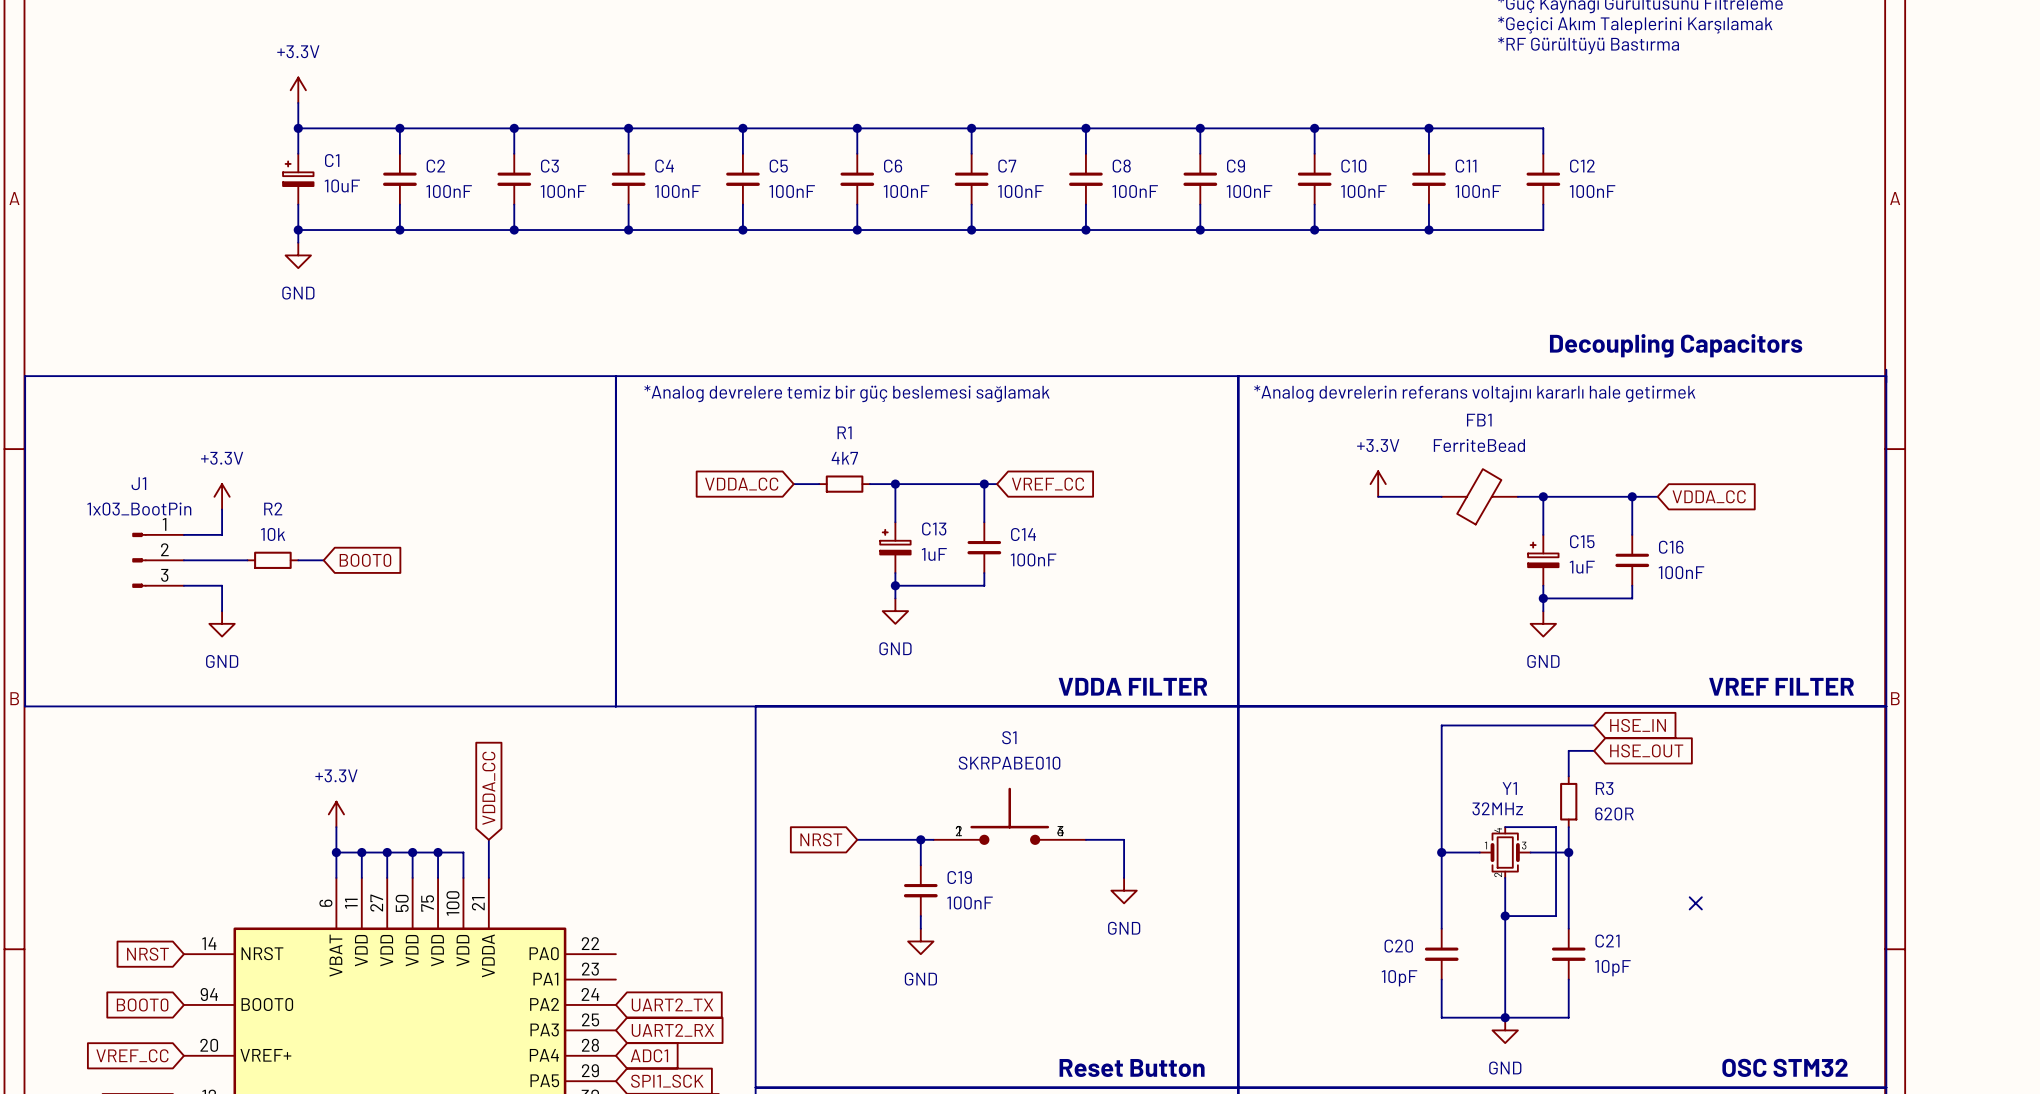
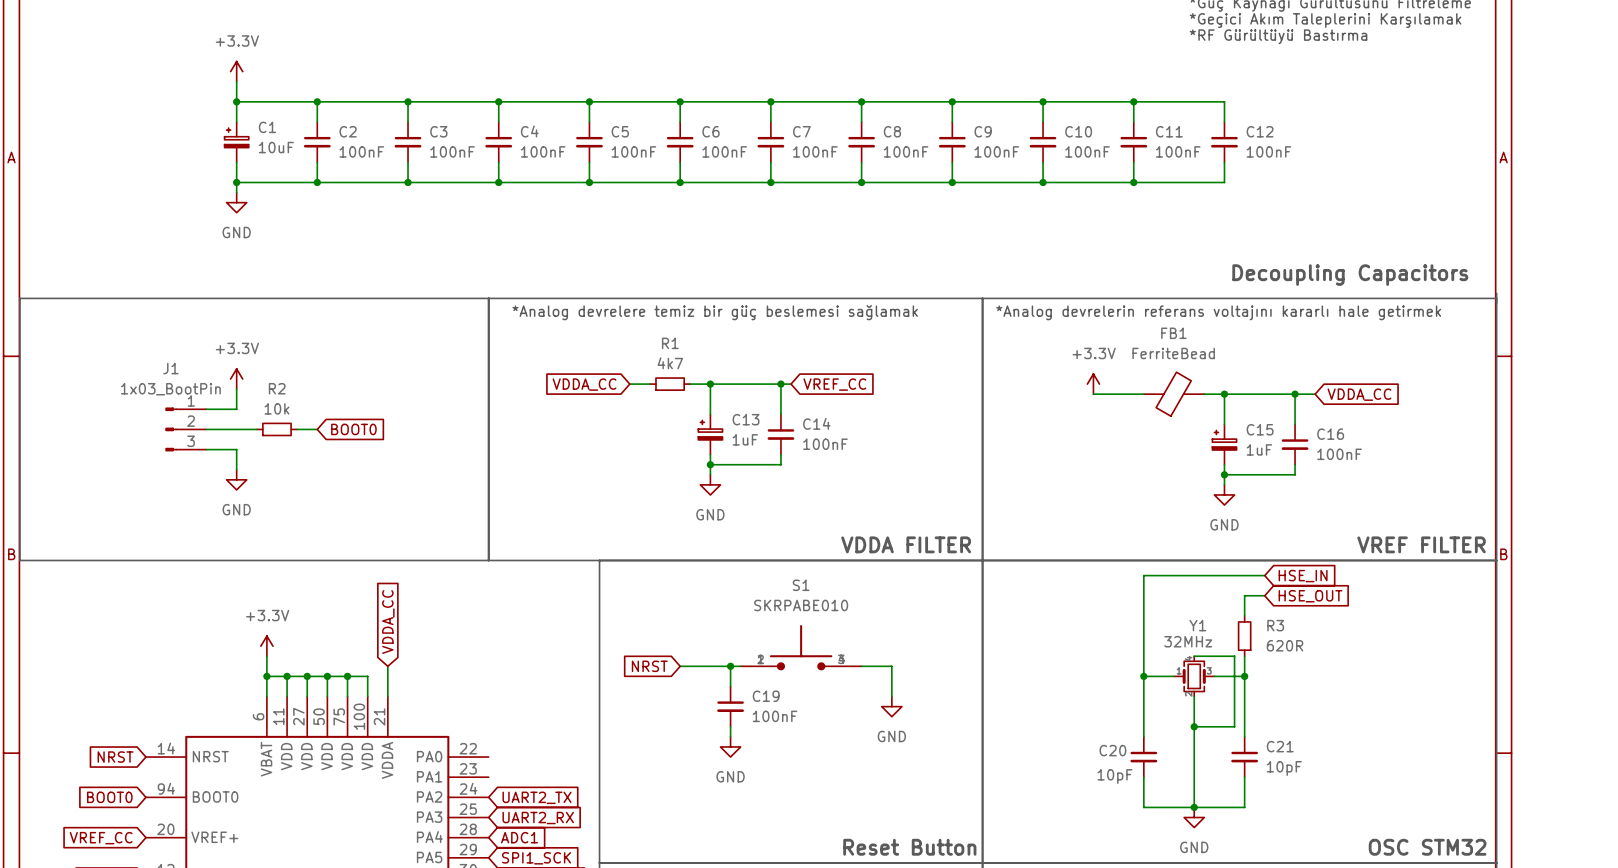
power symbol position: +3.3V (222, 496) -> +3.3V (236, 379)
wire: (222, 509) (222, 534) (183, 534) -> (236, 389) (236, 409) (206, 409)
J1 position: (158, 560) -> (185, 429)
wire: (183, 560) (247, 560) -> (206, 429) (256, 429)
R2 position: (272, 560) -> (276, 429)
wire: (298, 560) (323, 560) -> (297, 429) (317, 429)
global label position: BOOT0 (365, 560) -> BOOT0 (353, 429)
wire: (183, 585) (222, 585) (222, 611) -> (206, 449) (236, 449) (236, 469)
power symbol position: GND (222, 623) -> GND (236, 479)
no-connect mark: (1695, 903) -> none

